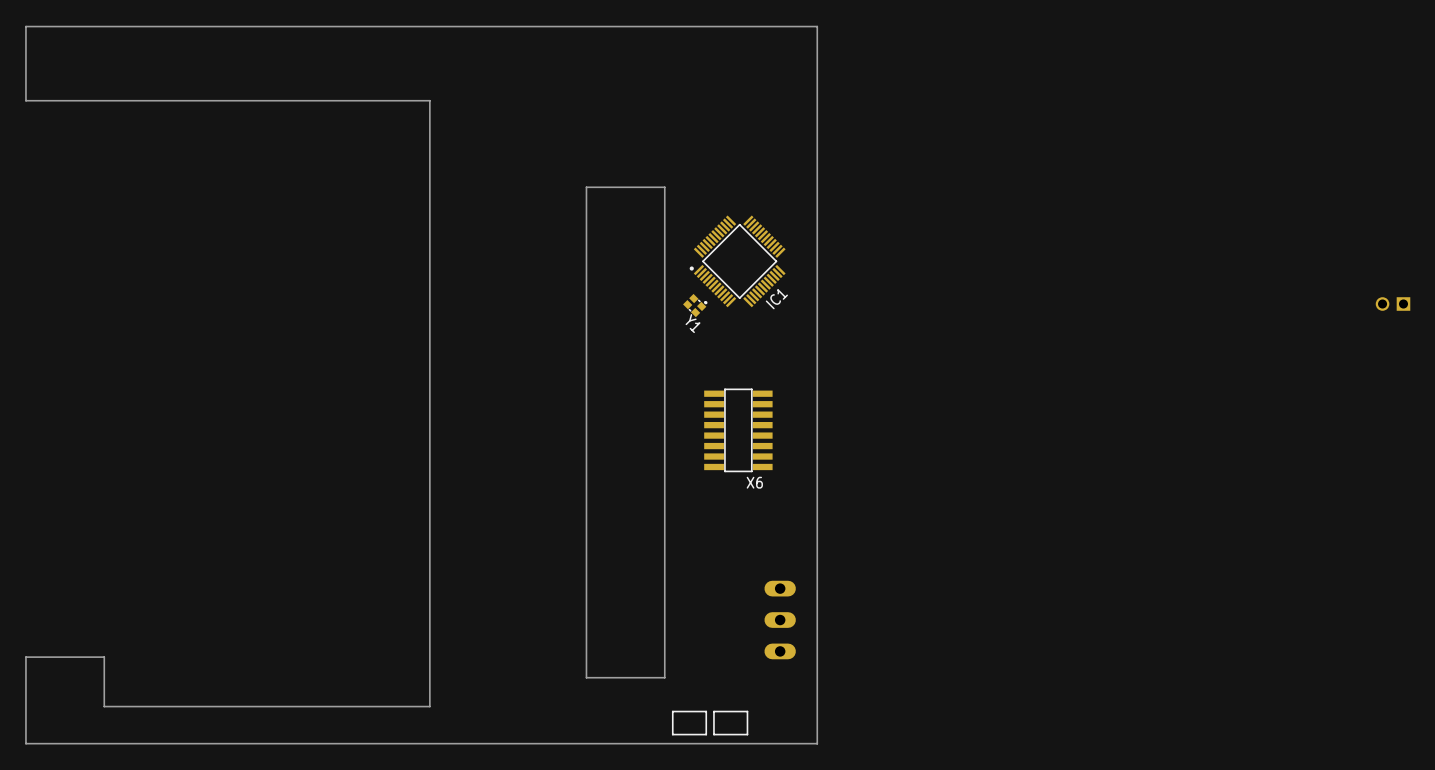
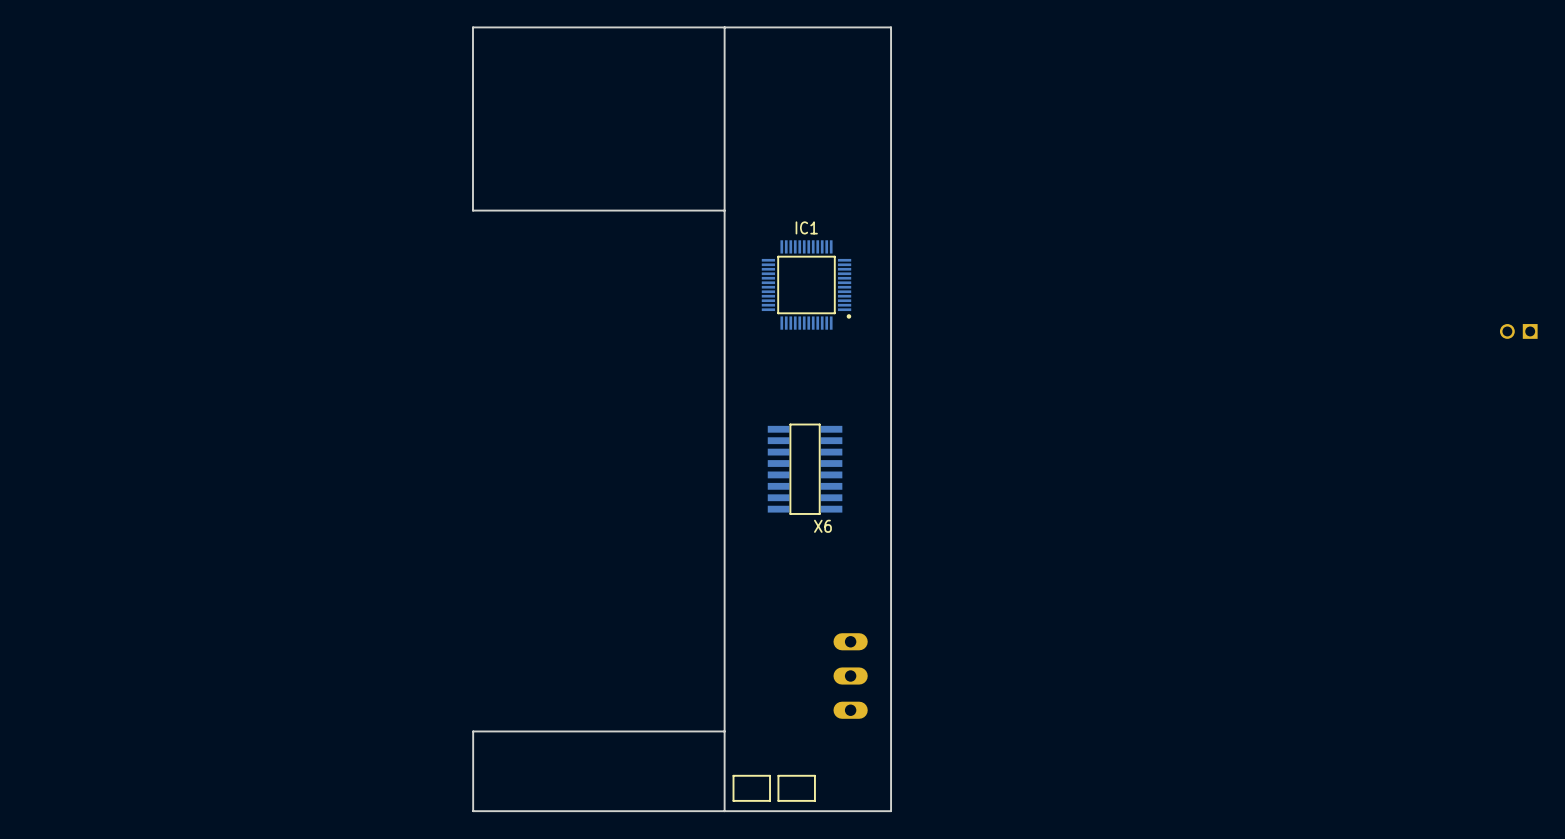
board edge: none -> (724, 27) (724, 210)
board edge: none -> (724, 27) (472, 27) (472, 210) (724, 210)
board edge: (817, 26) (25, 26) (25, 100) (429, 100) (429, 706) (104, 706) (104, 657) (25, 657) (25, 743) (817, 743) -> (891, 28) (891, 27) (724, 27)
board edge: (664, 187) (664, 677) (586, 677) (586, 187) (664, 187) -> none
board edge: none -> (724, 210) (724, 811)
IC1 rotation: 0° (737, 261) -> 135° counterclockwise (806, 284)
Y1: (695, 305) -> none
board edge: none -> (724, 731) (473, 731) (473, 811) (891, 811)

